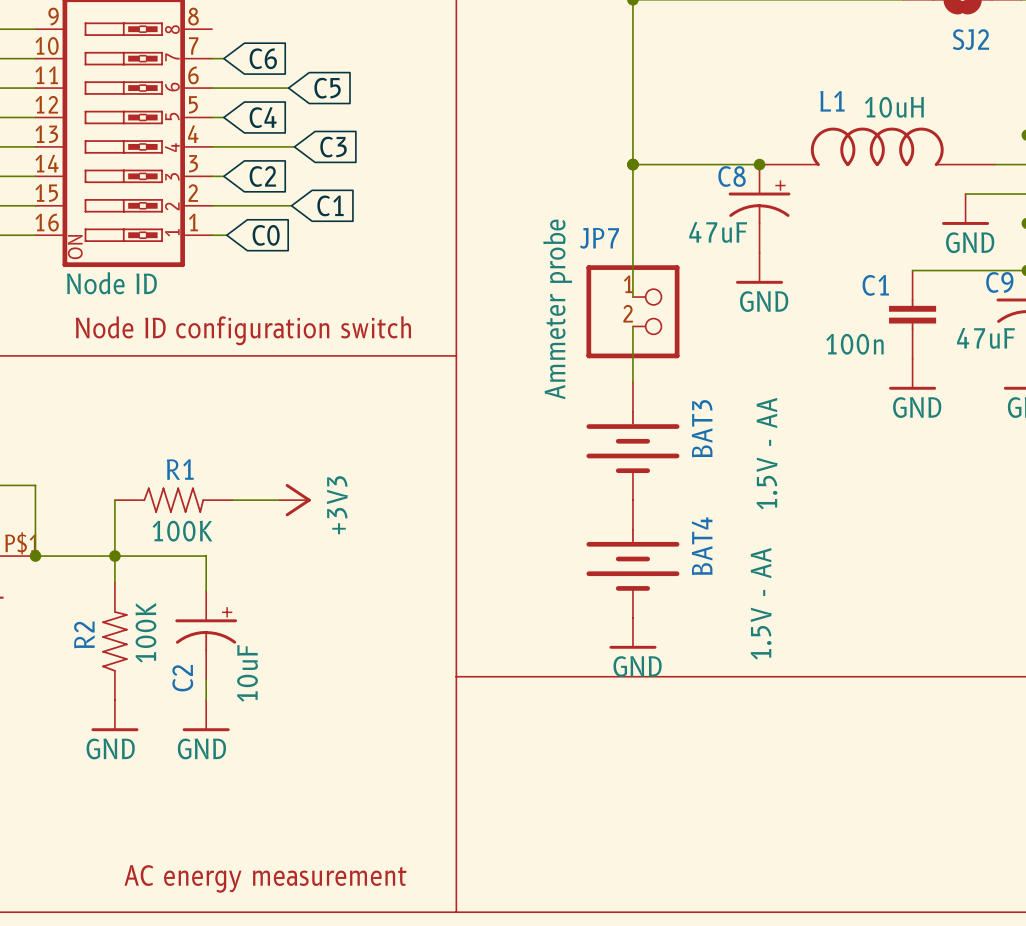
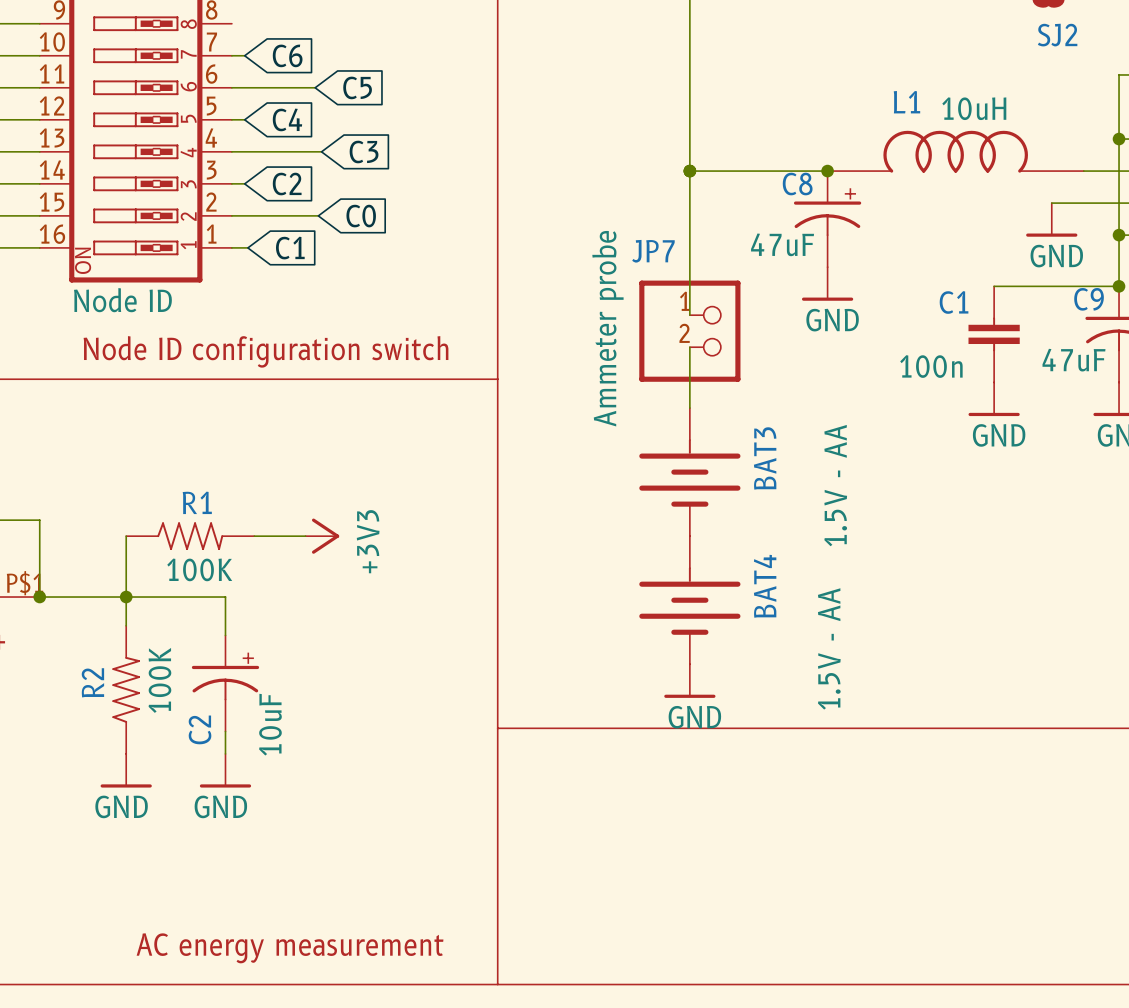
global label: C1 (330, 205) -> C0 (361, 216)
global label: C0 (266, 235) -> C1 (290, 248)

